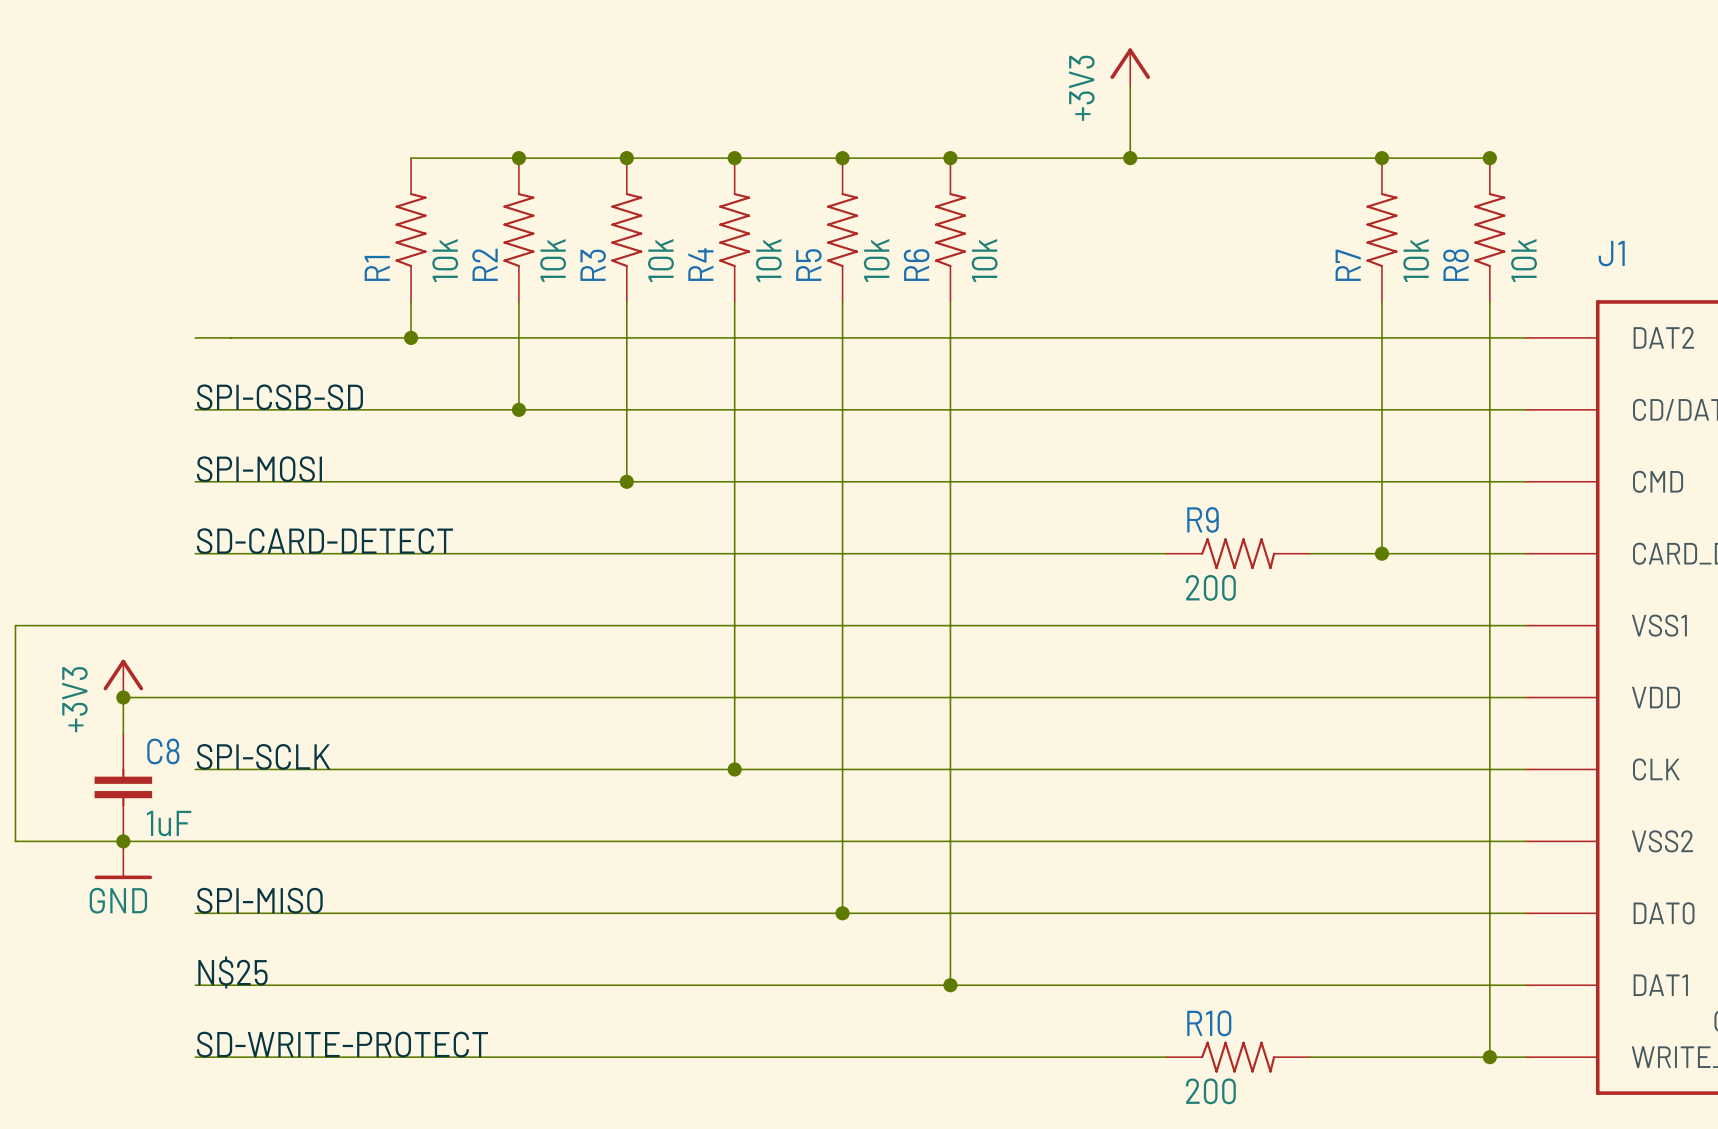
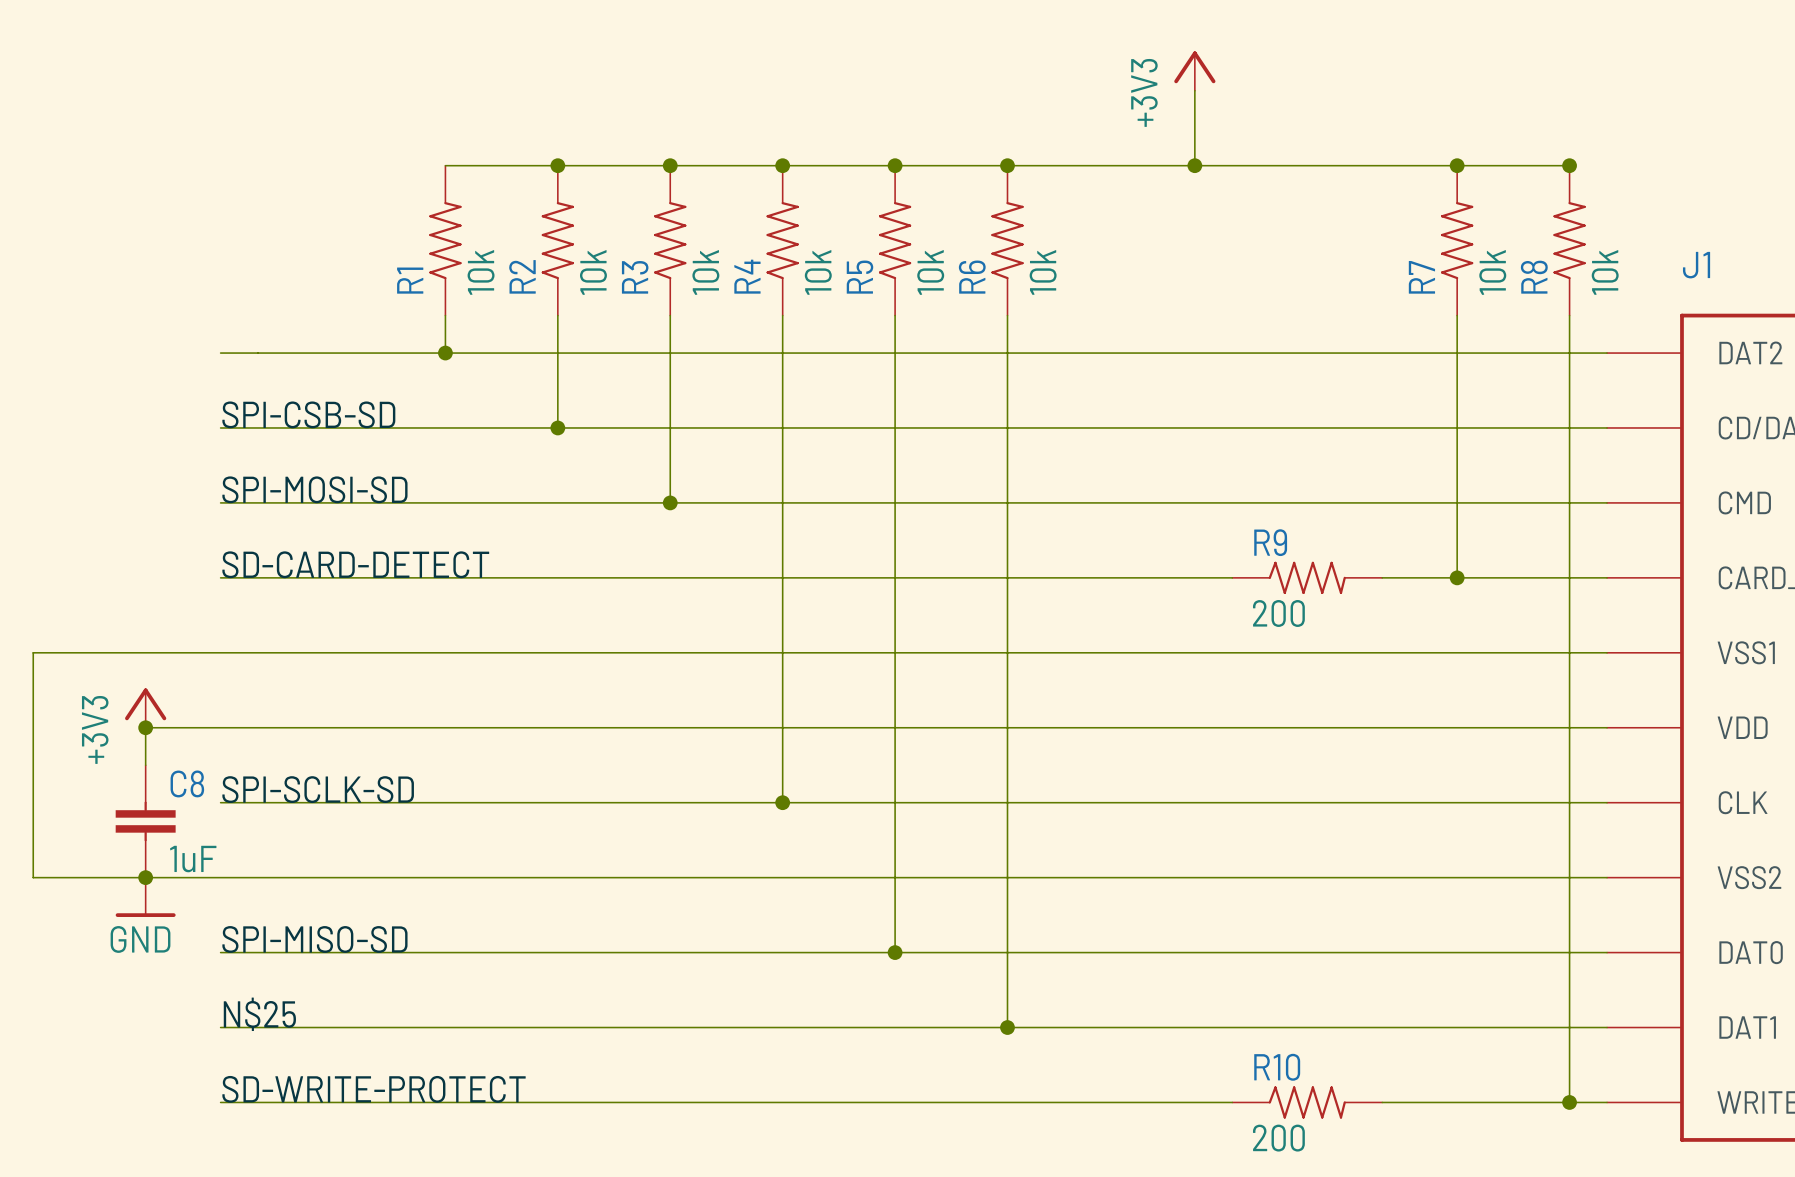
label: SPI-MOSI (259, 469) -> SPI-MOSI-SD (314, 489)
label: SPI-SCLK (263, 756) -> SPI-SCLK-SD (318, 789)
label: SPI-MISO (259, 900) -> SPI-MISO-SD (314, 939)

